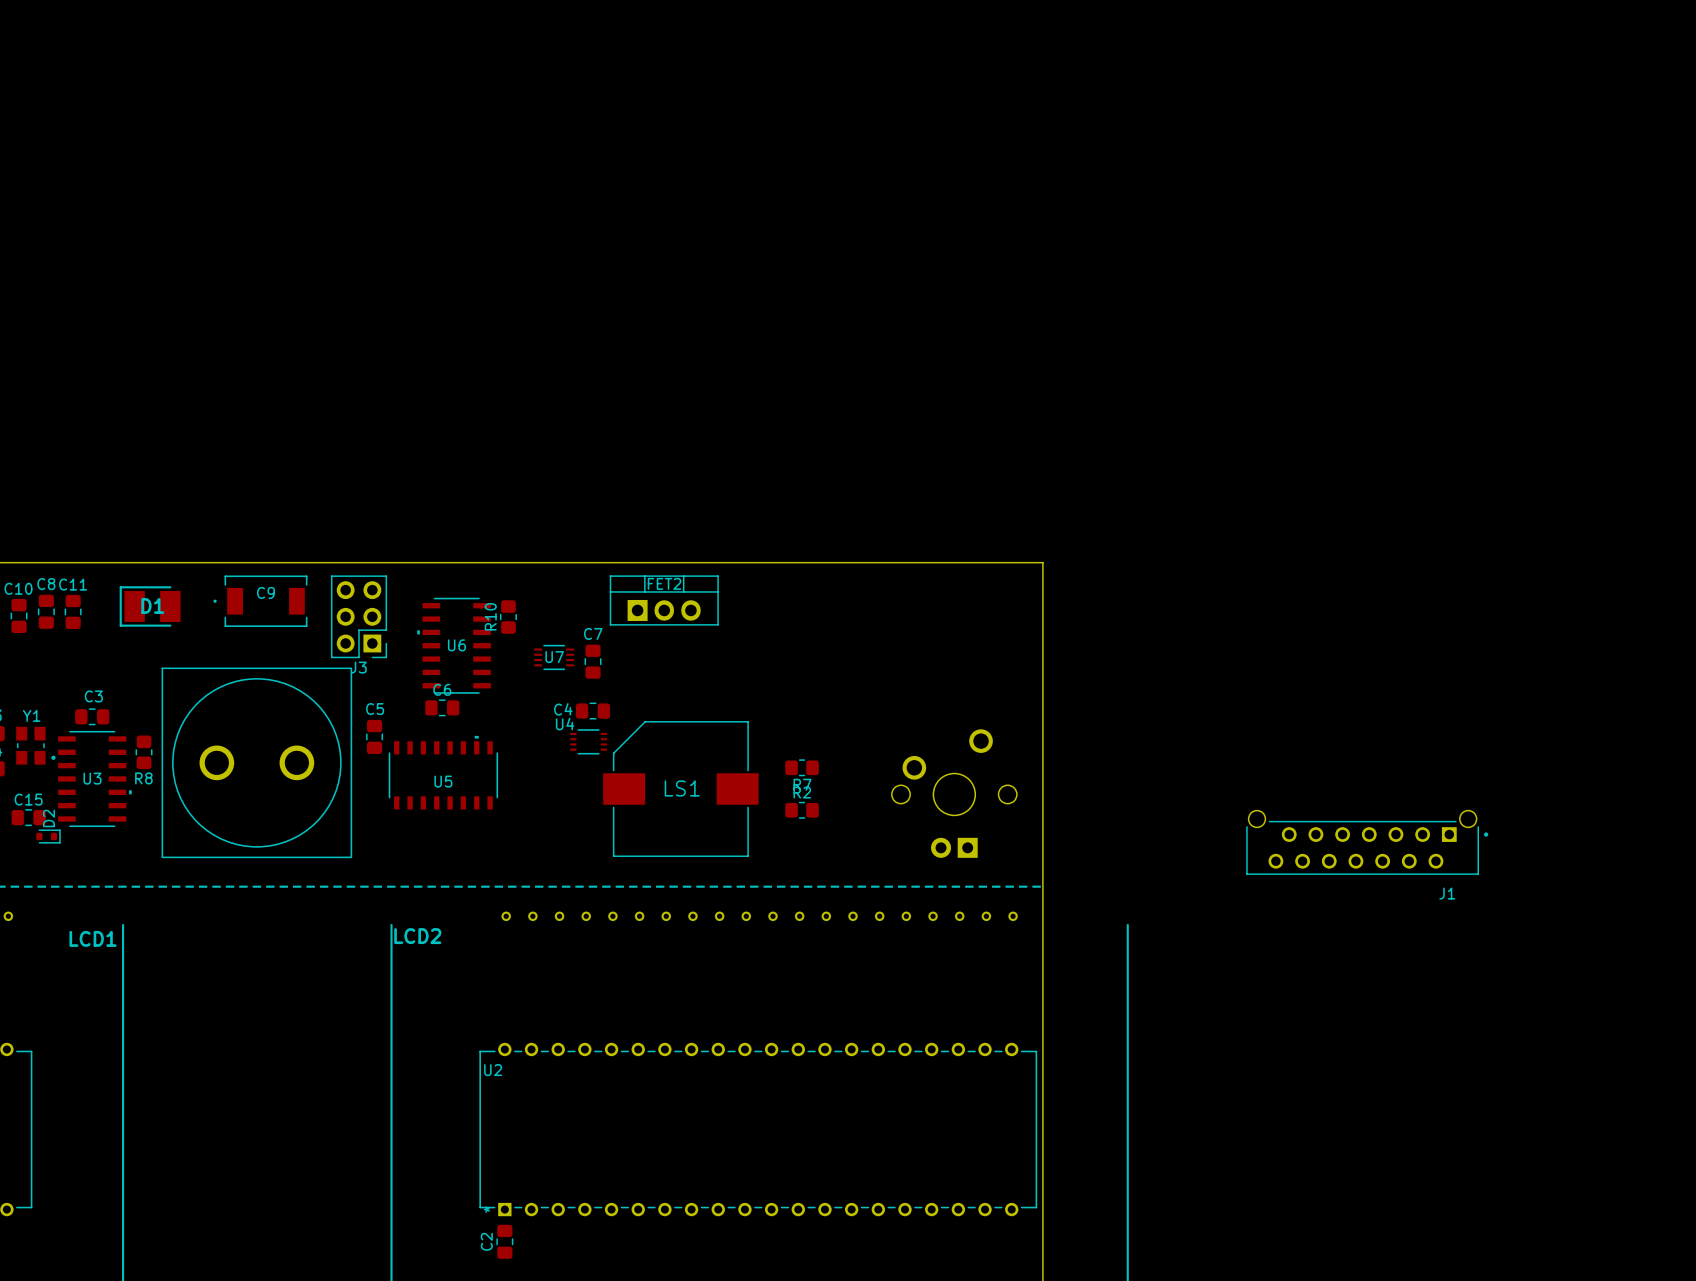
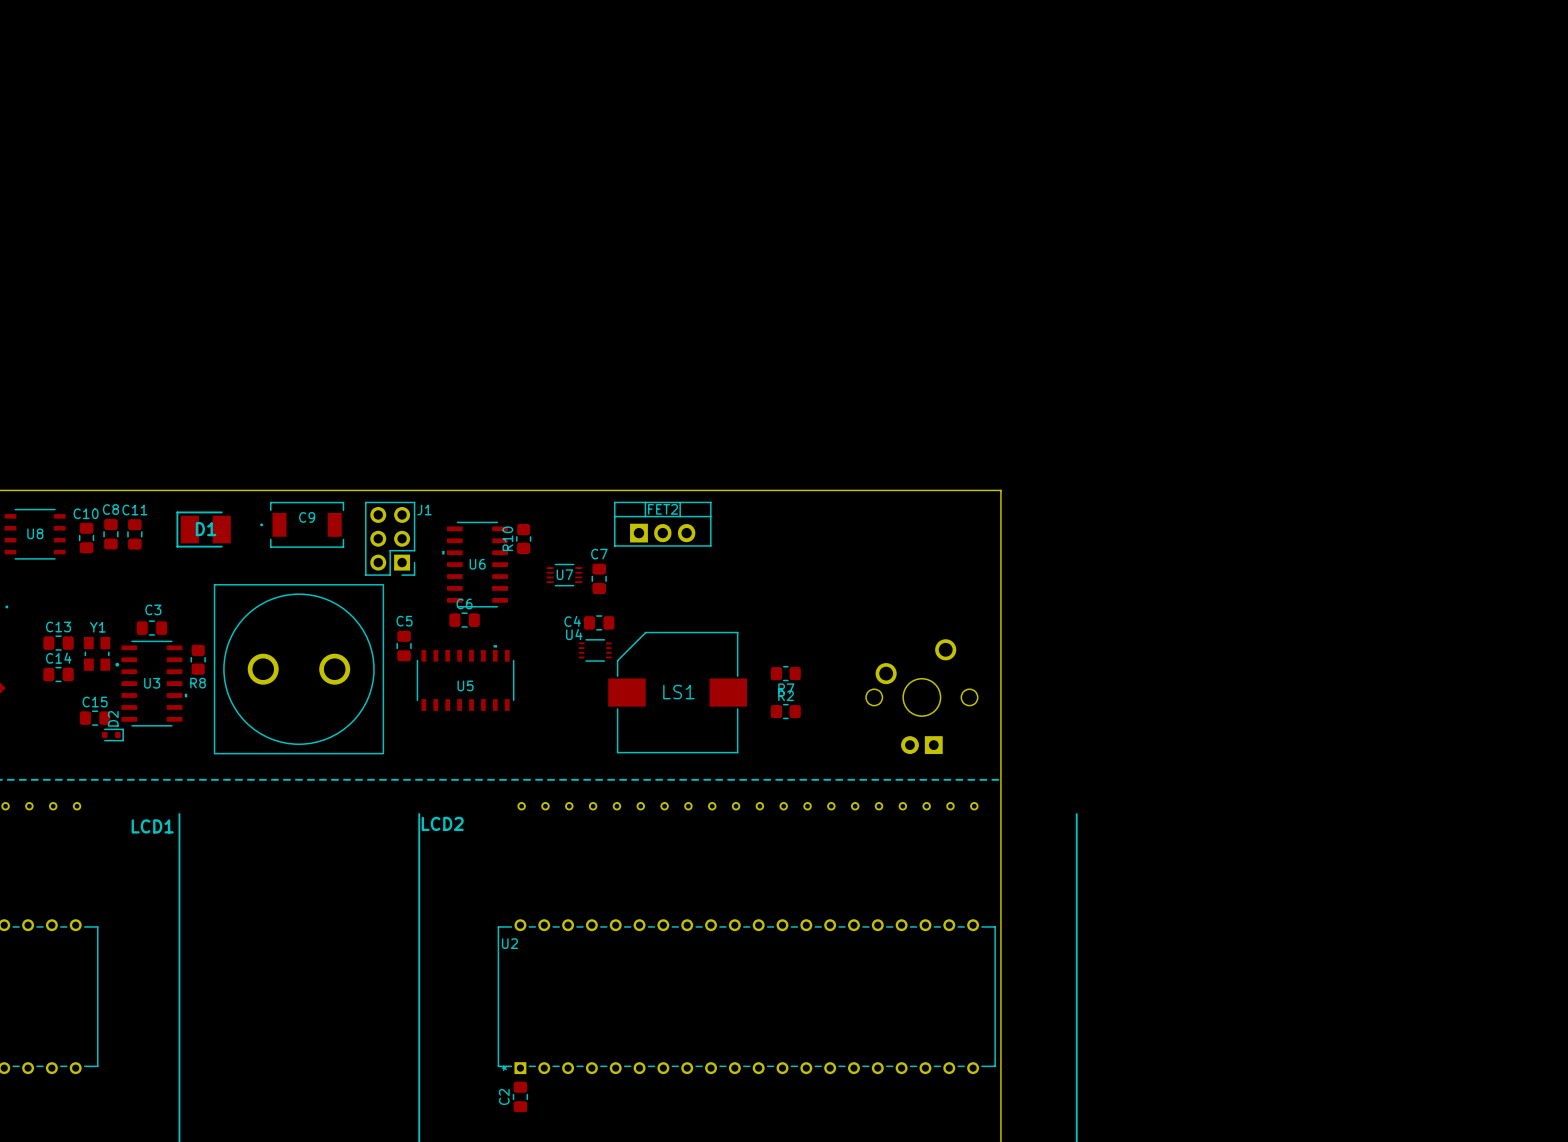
J3 name: J3 (358, 667) -> J1 (424, 510)
J1: (1367, 842) -> none

